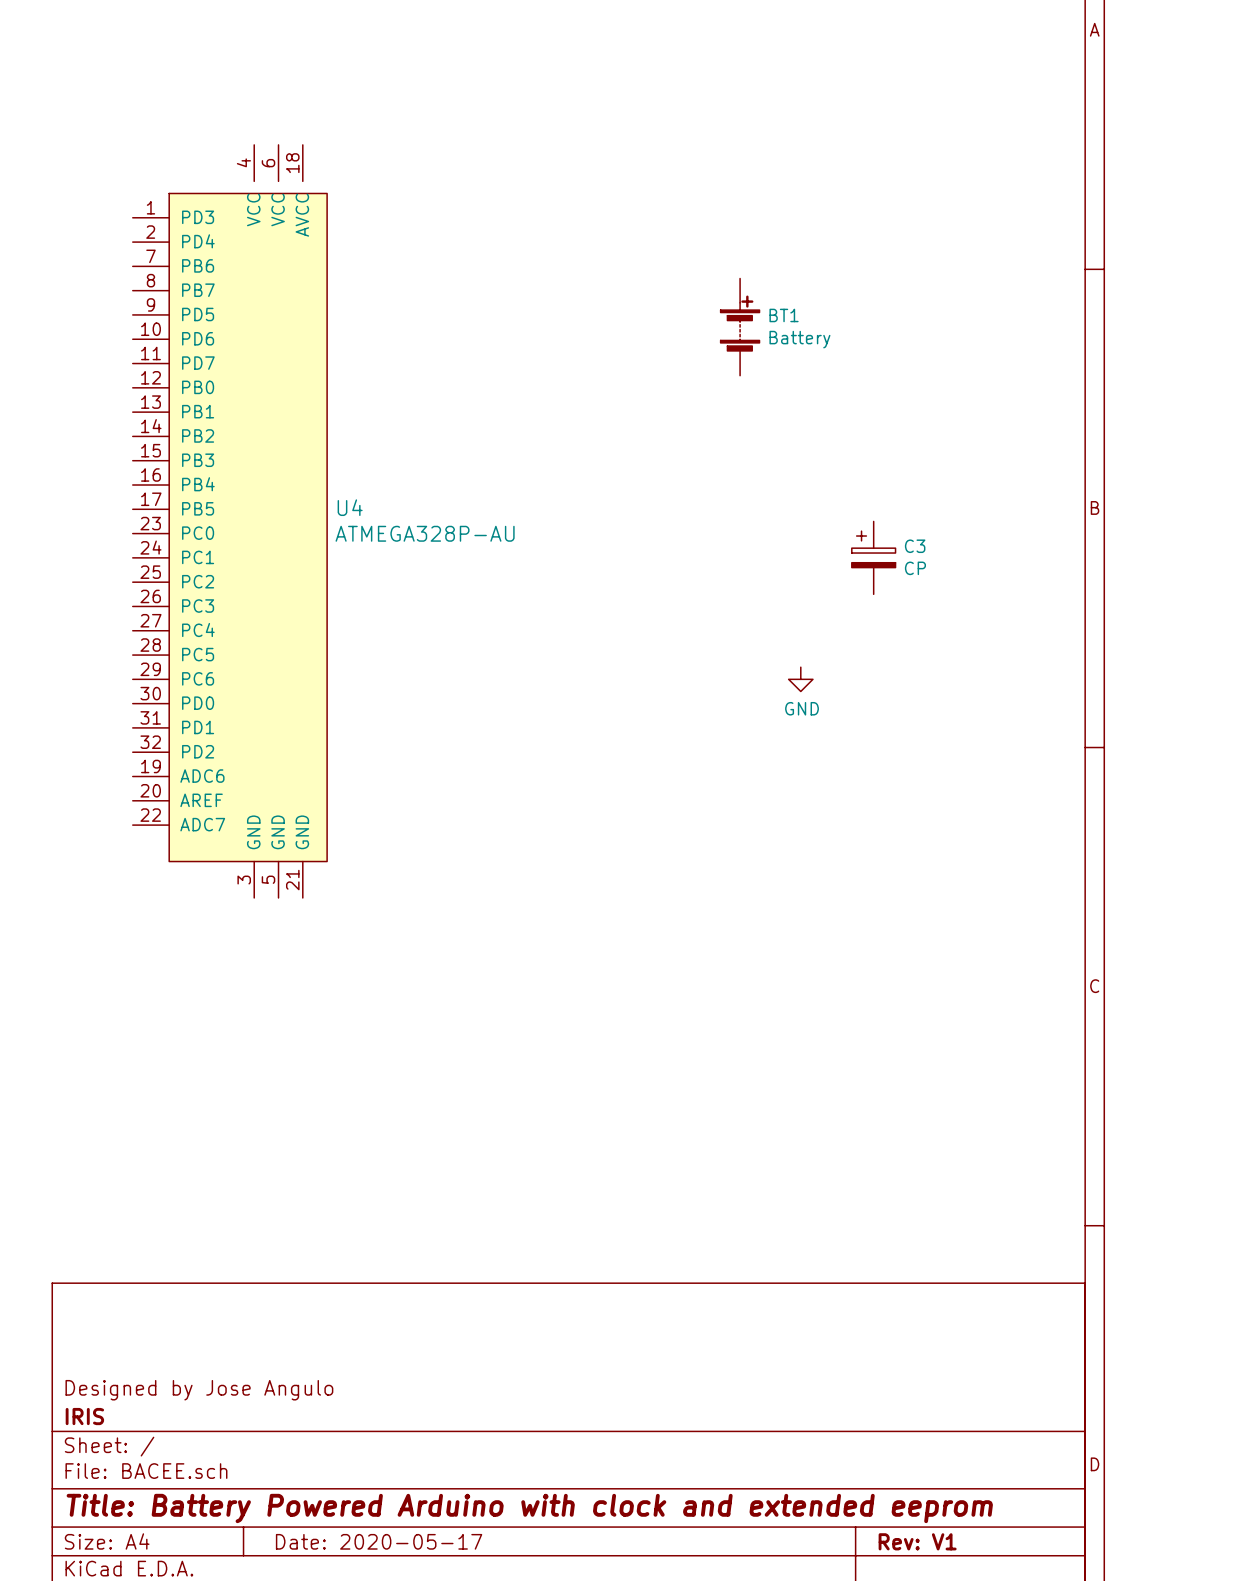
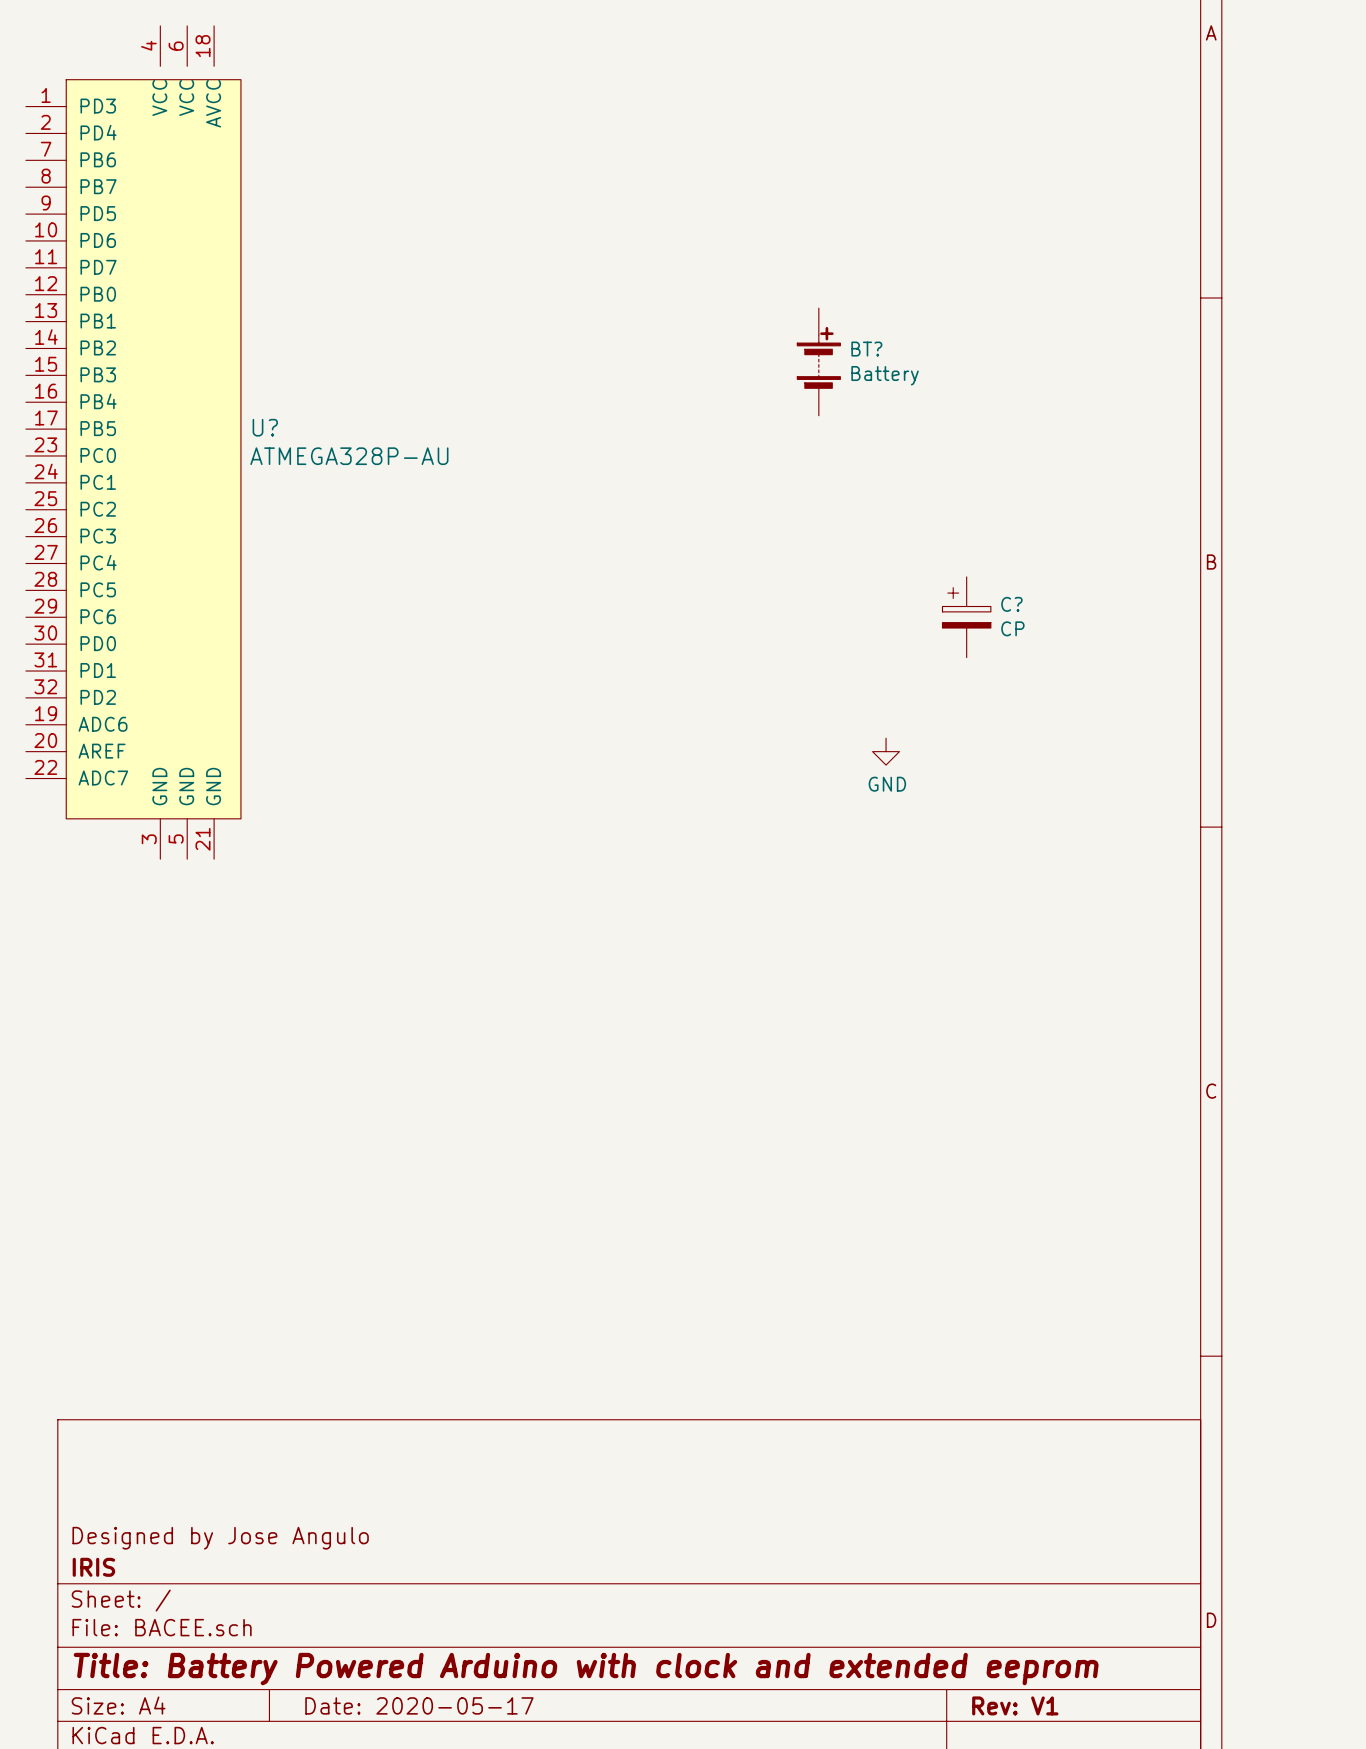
BT1 name: BT1 (784, 315) -> BT? (866, 349)
U?: none -> ATMEGA328P-AU (133, 442)
U4: ATMEGA328P-AU (229, 521) -> none
C3 name: C3 (915, 546) -> C? (1011, 604)

